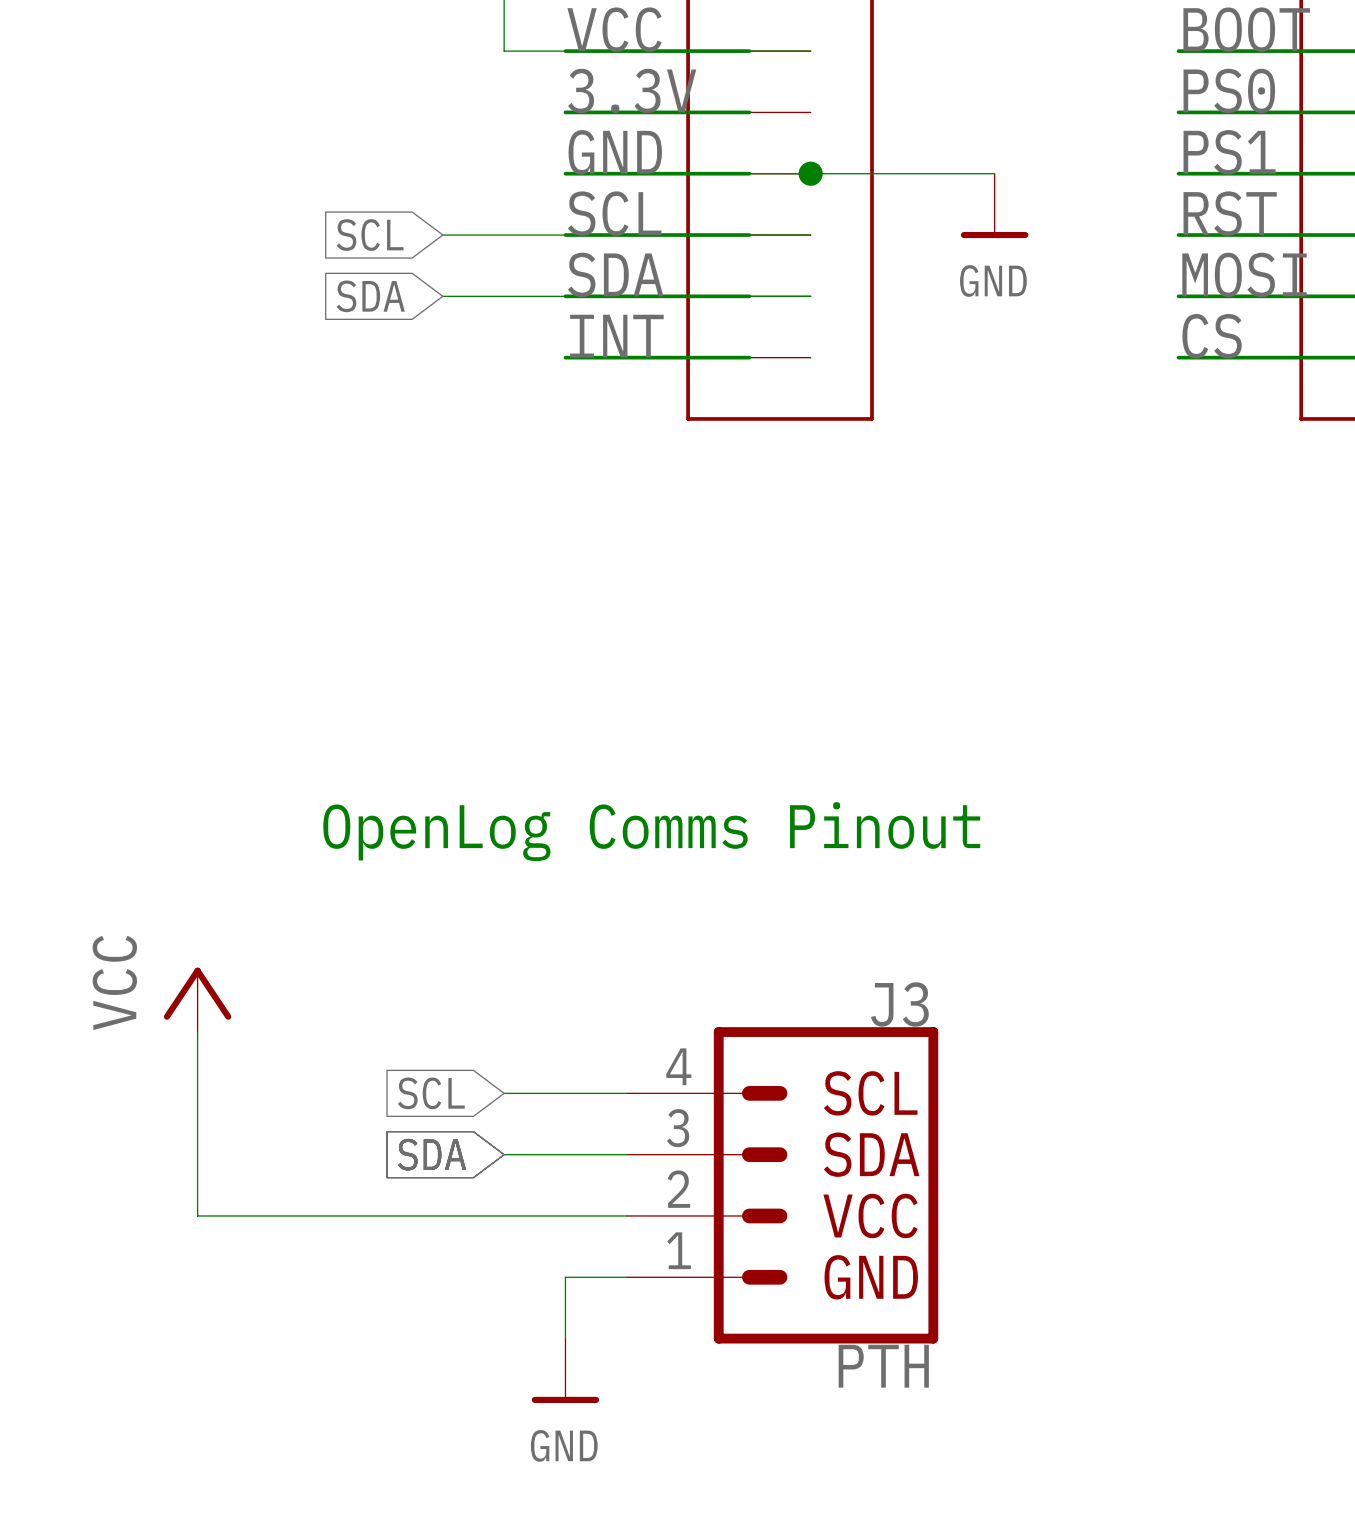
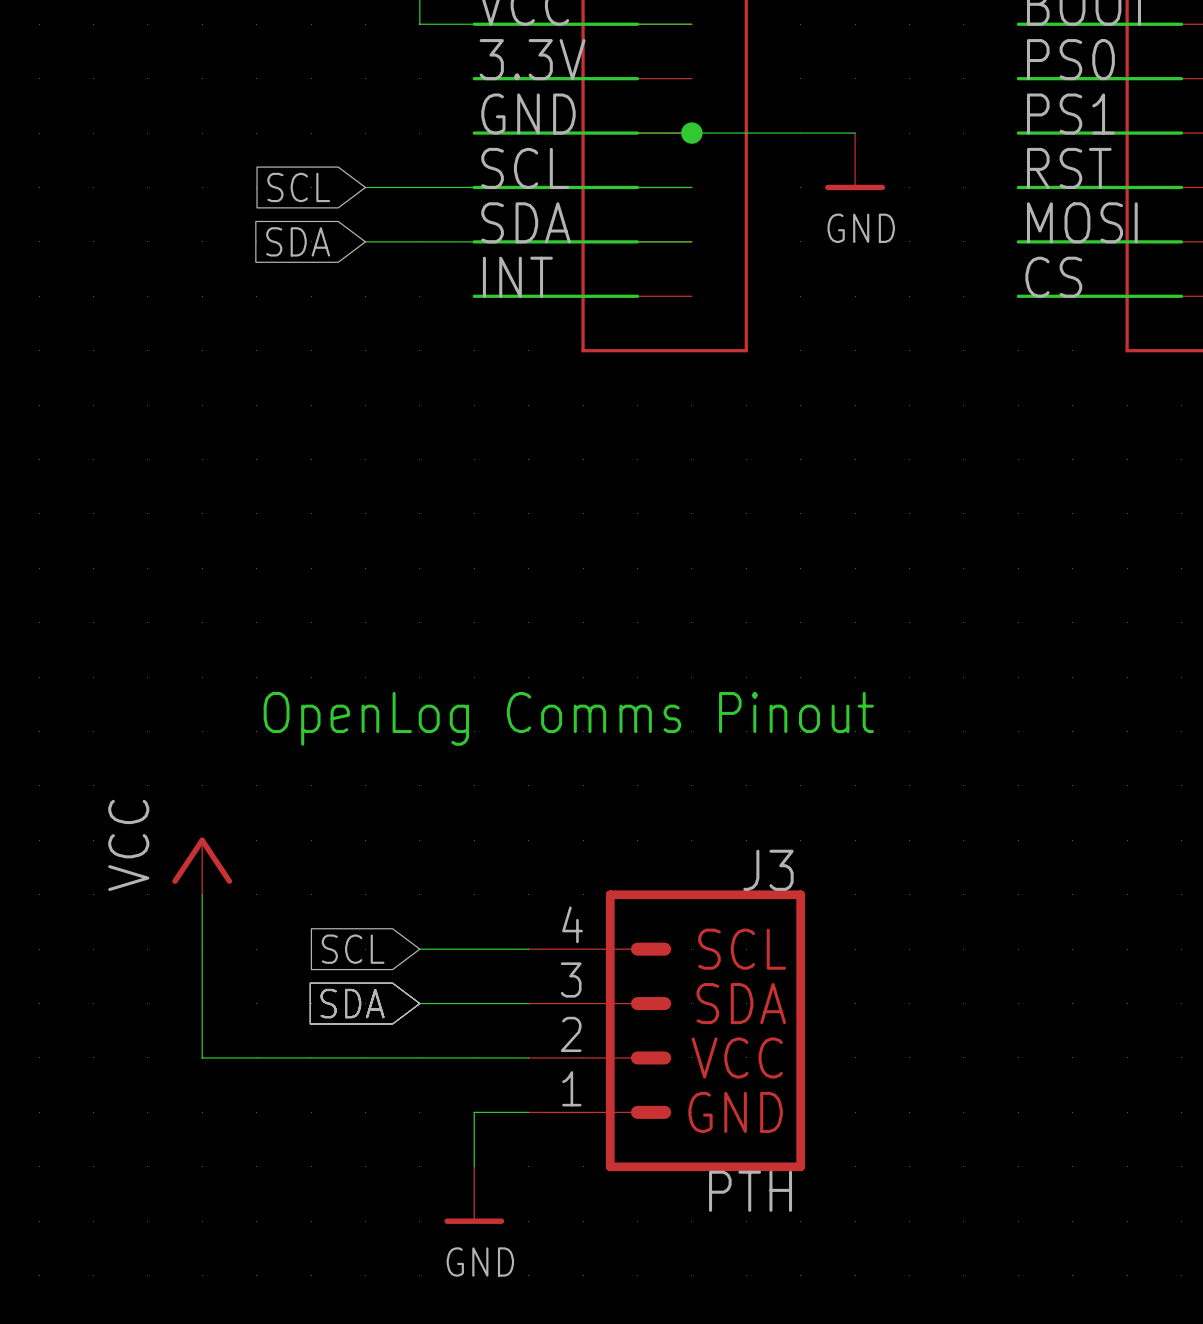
power symbol position: VCC (197, 999) -> VCC (202, 866)
wire: (197, 1032) (197, 1215) (258, 1215) -> (202, 894) (202, 1057)

